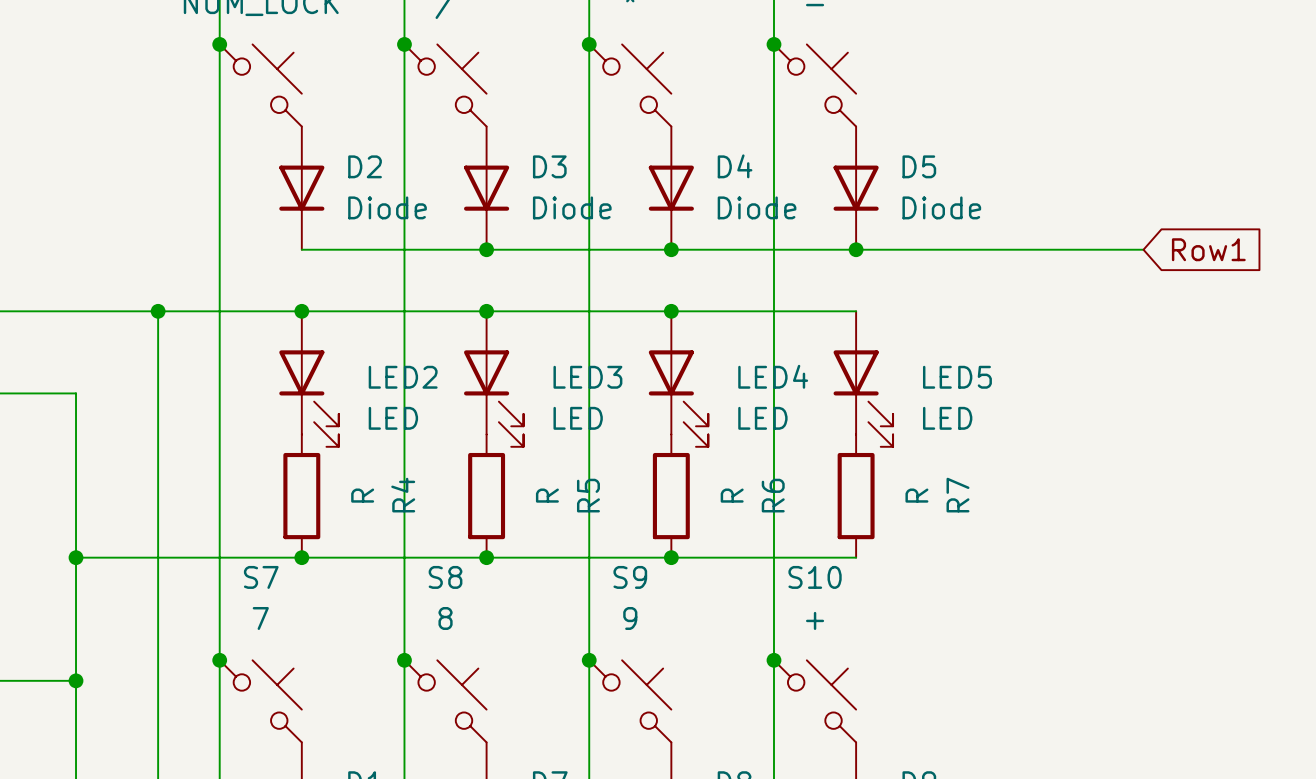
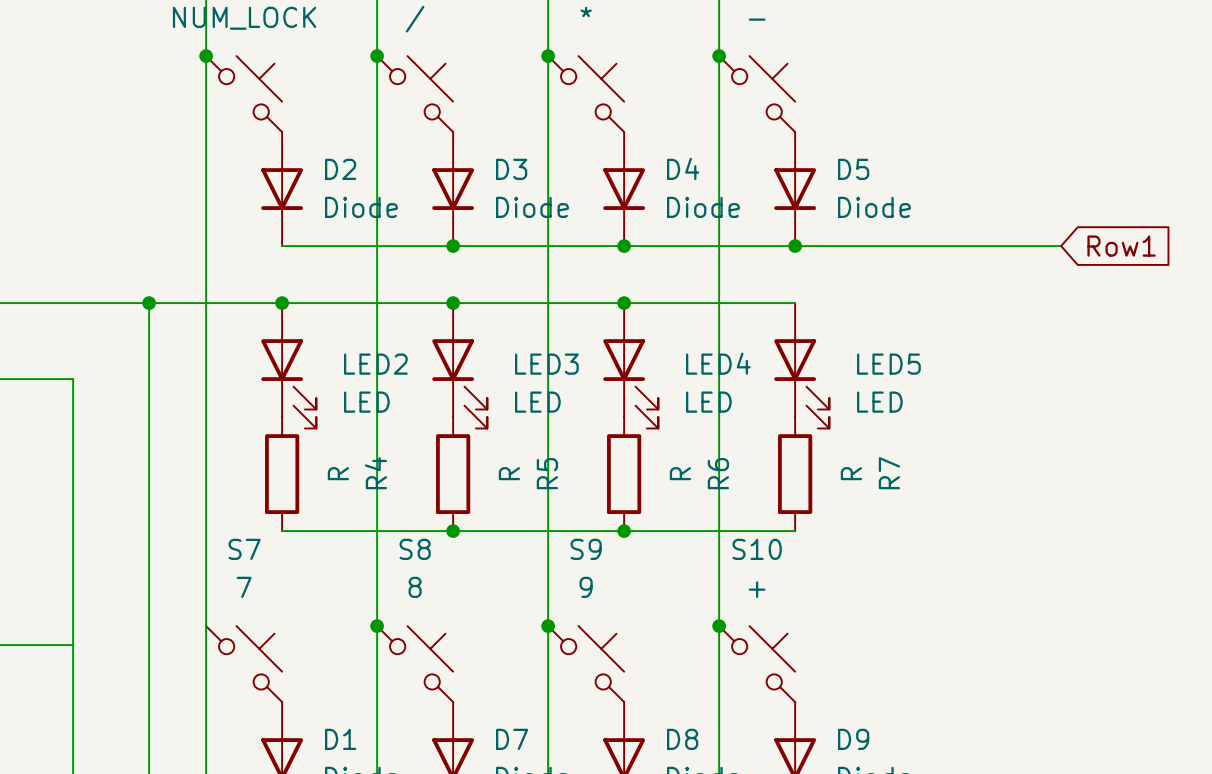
wire: (76, 557) (301, 557) -> none
junction: (76, 557) -> none
junction: (301, 557) -> none
junction: (219, 660) -> none
junction: (76, 680) -> none

